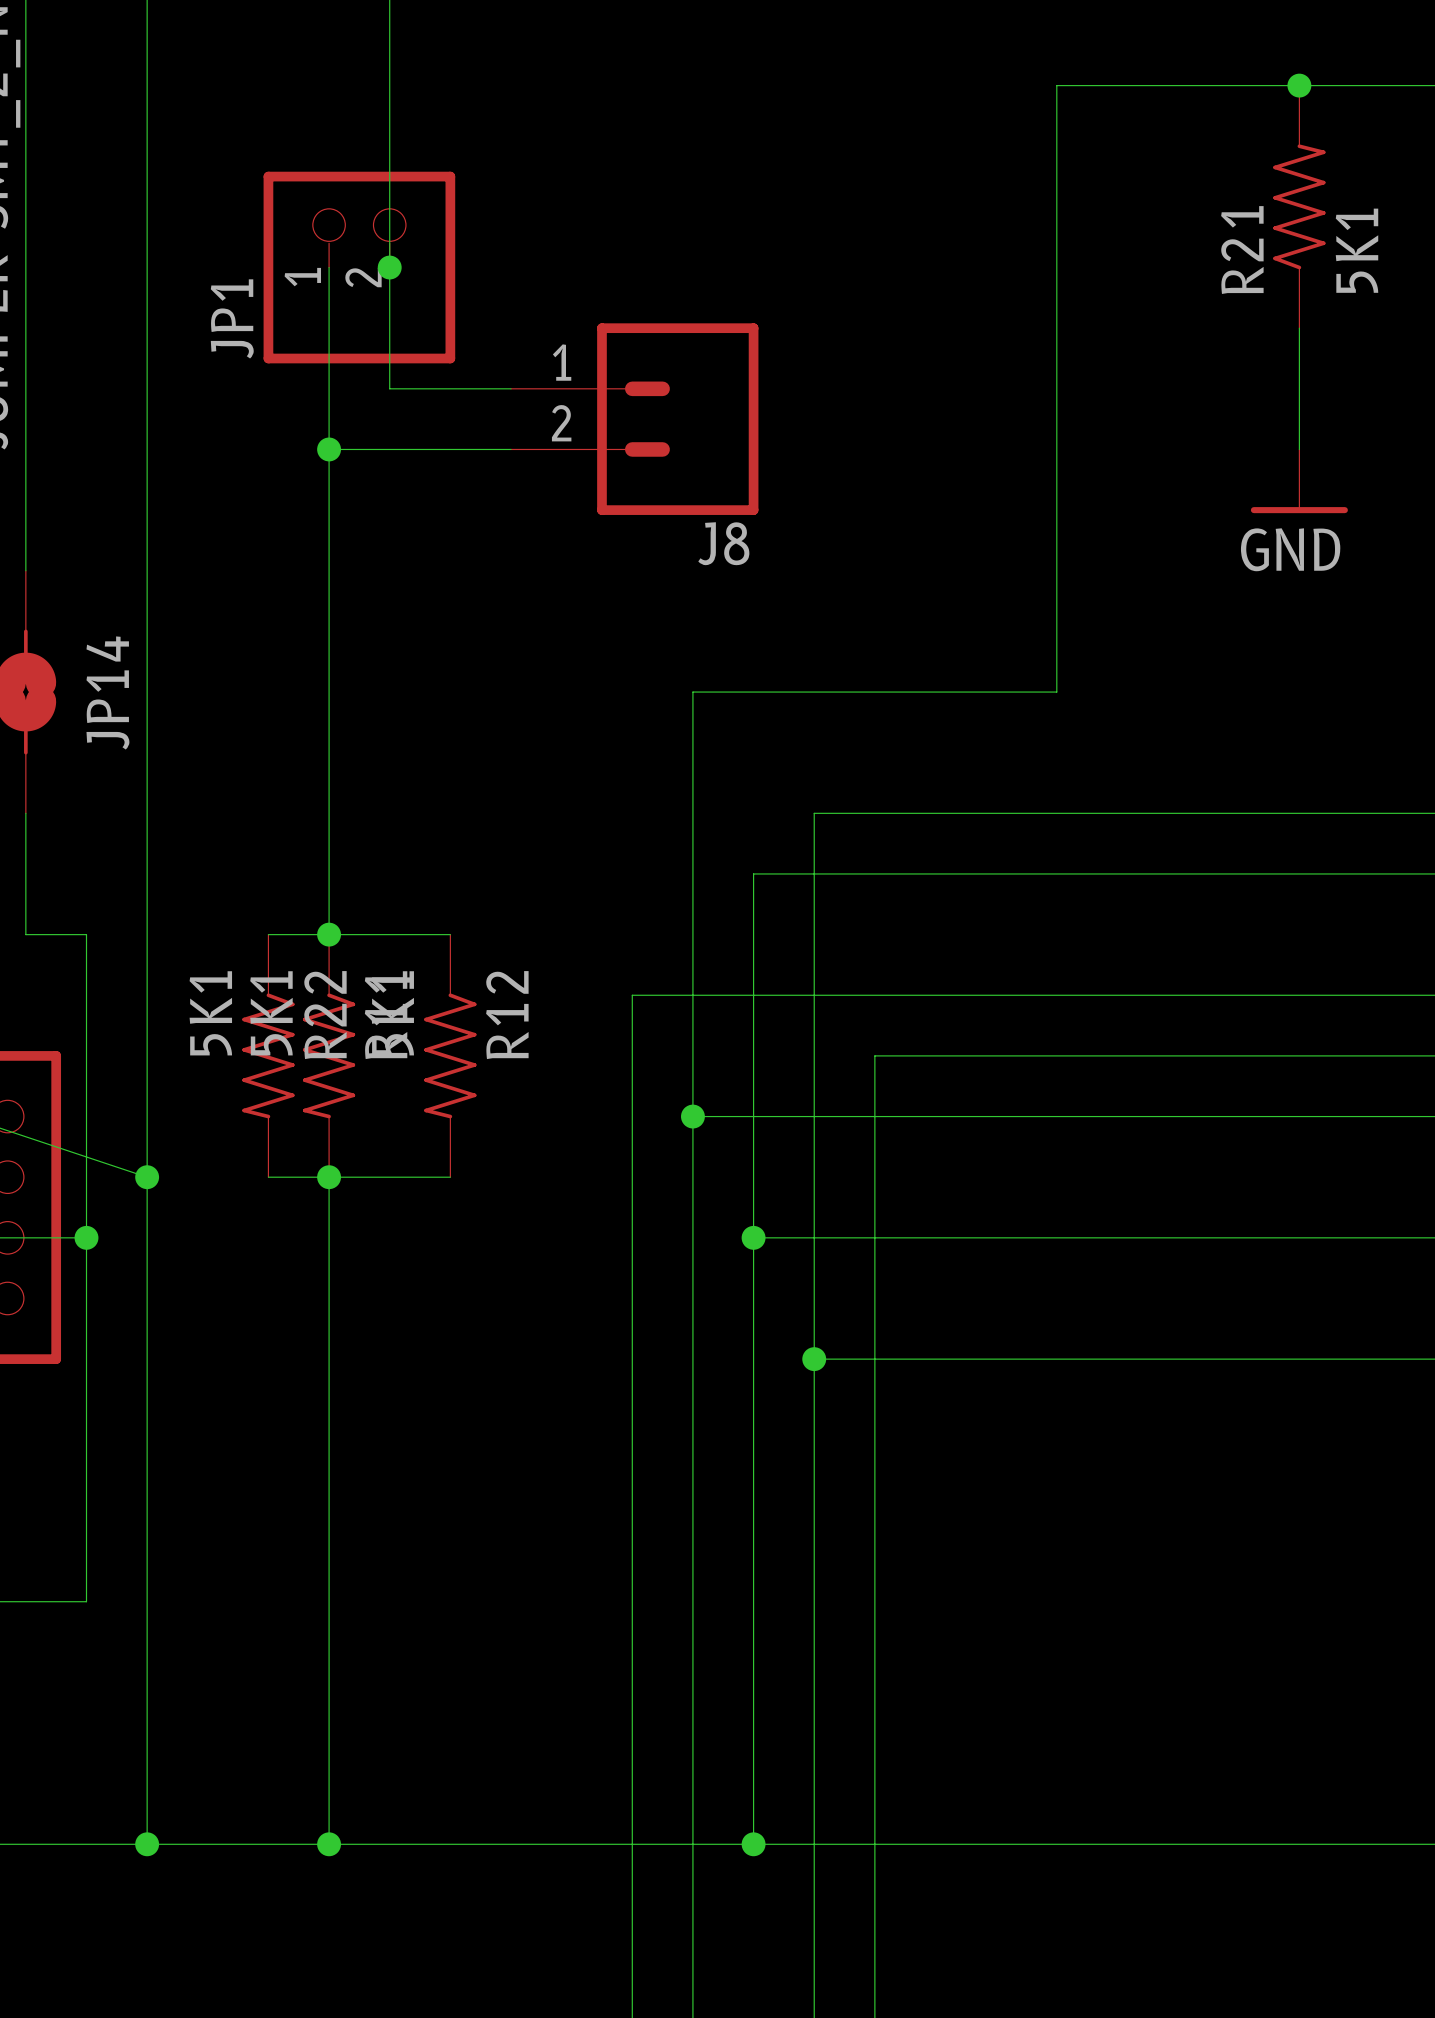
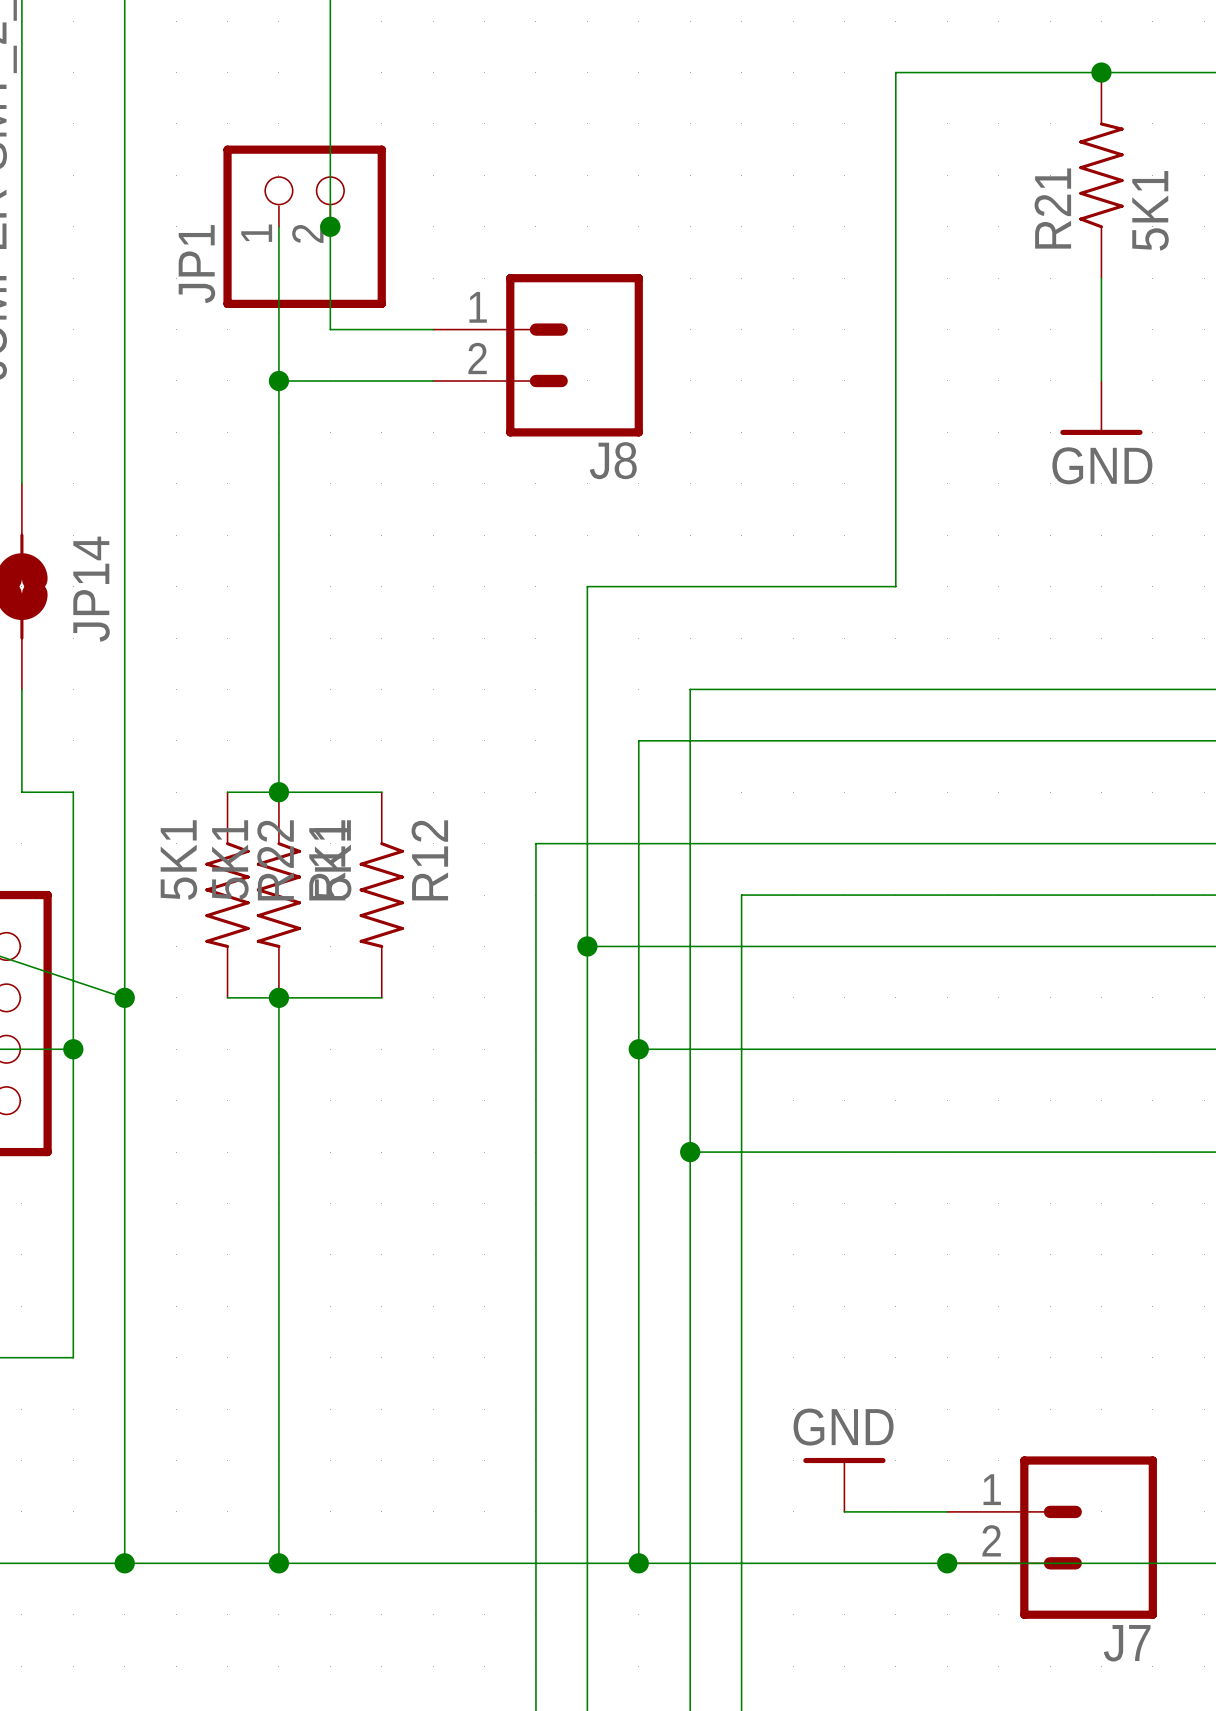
power symbol: none -> GND (844, 1484)
wire: none -> (844, 1511) (947, 1511)
J7: none -> (1052, 1537)
junction: none -> (947, 1563)

